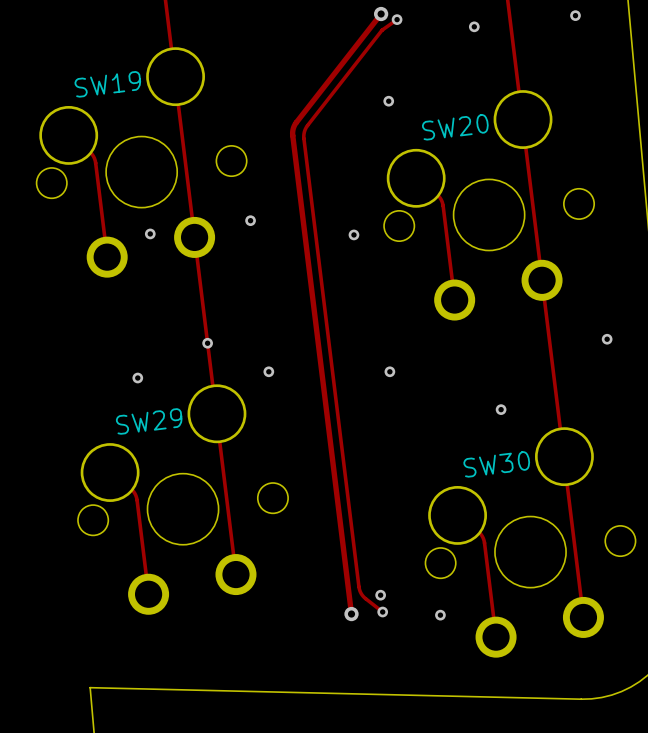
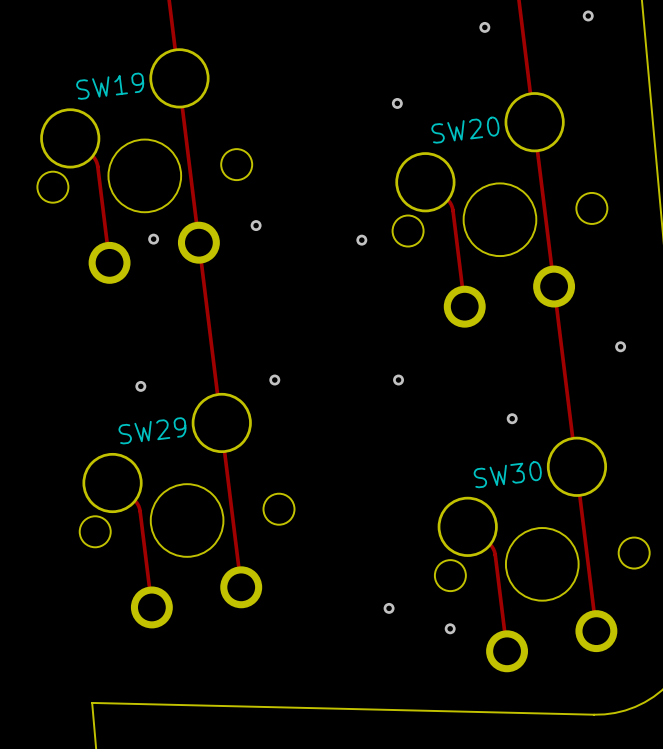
track: (381, 14) (296, 122) (292, 132) (351, 614) -> none
via: (381, 14) -> none
track: (397, 19) (382, 29) -> none
via: (397, 19) -> none
track: (382, 30) (307, 125) (303, 136) (358, 586) (363, 596) (382, 612) -> none
via: (207, 343) -> none
via: (382, 612) -> none
via: (351, 614) -> none

